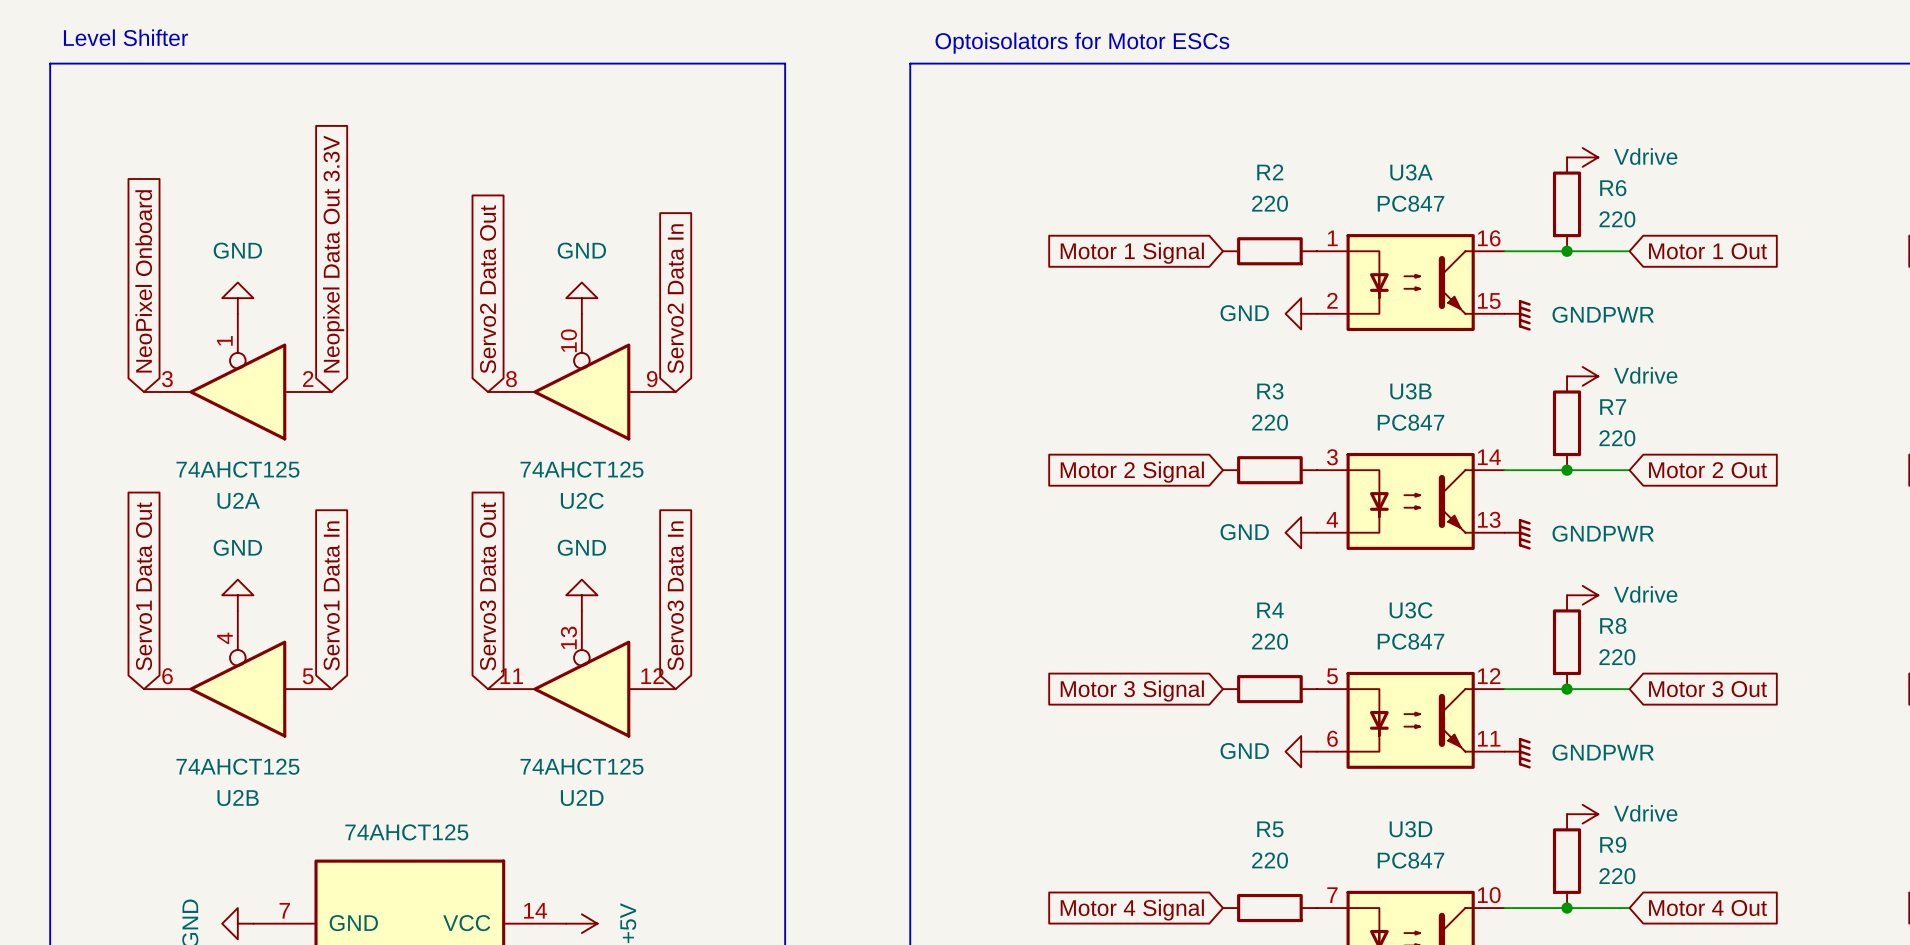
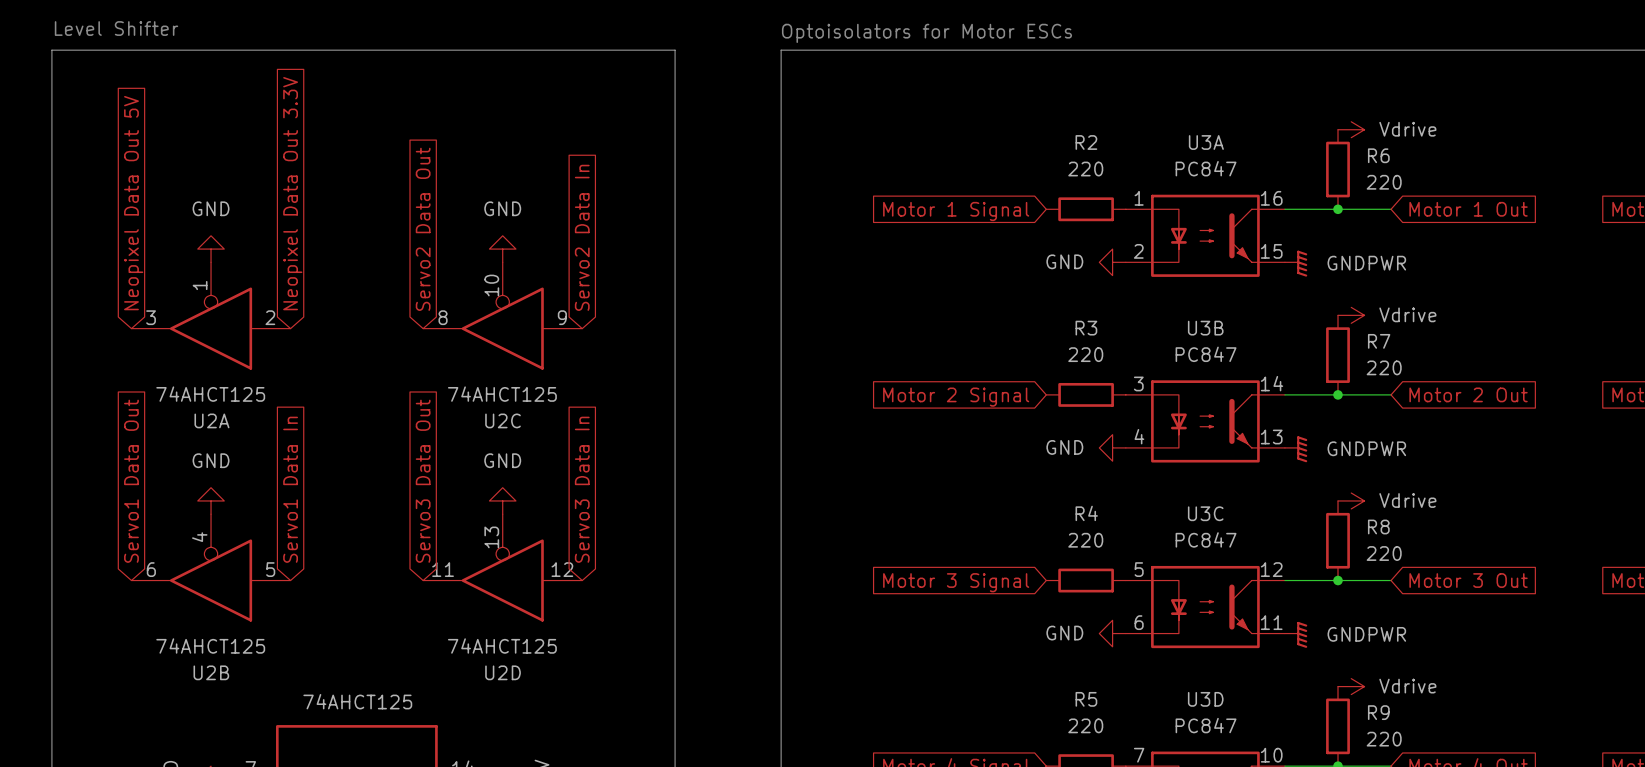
global label: NeoPixel Onboard (143, 281) -> Neopixel Data Out 5V (133, 203)

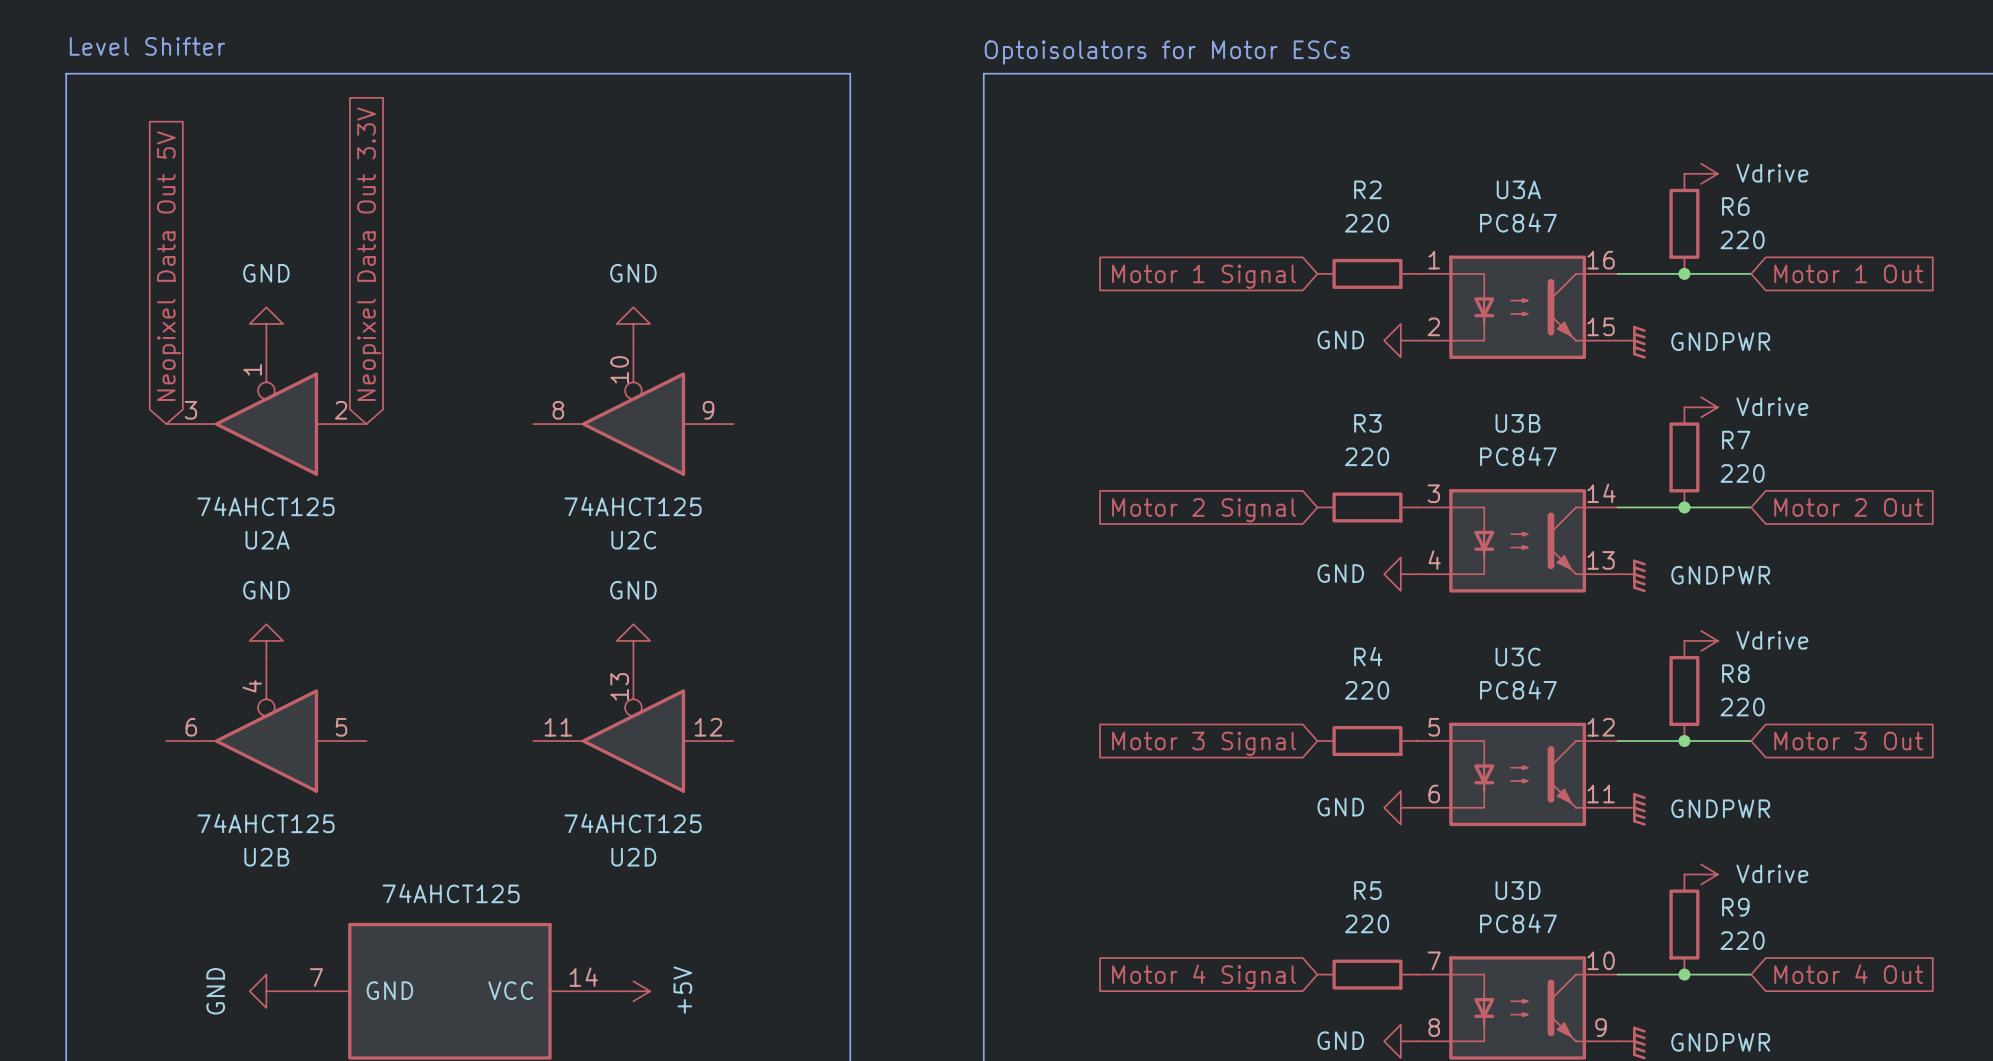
global label: Servo2 Data Out (423, 229) -> none
global label: Servo2 Data In (582, 237) -> none
global label: Servo1 Data Out (131, 481) -> none
global label: Servo3 Data Out (423, 481) -> none
global label: Servo1 Data In (290, 489) -> none
global label: Servo3 Data In (582, 489) -> none

